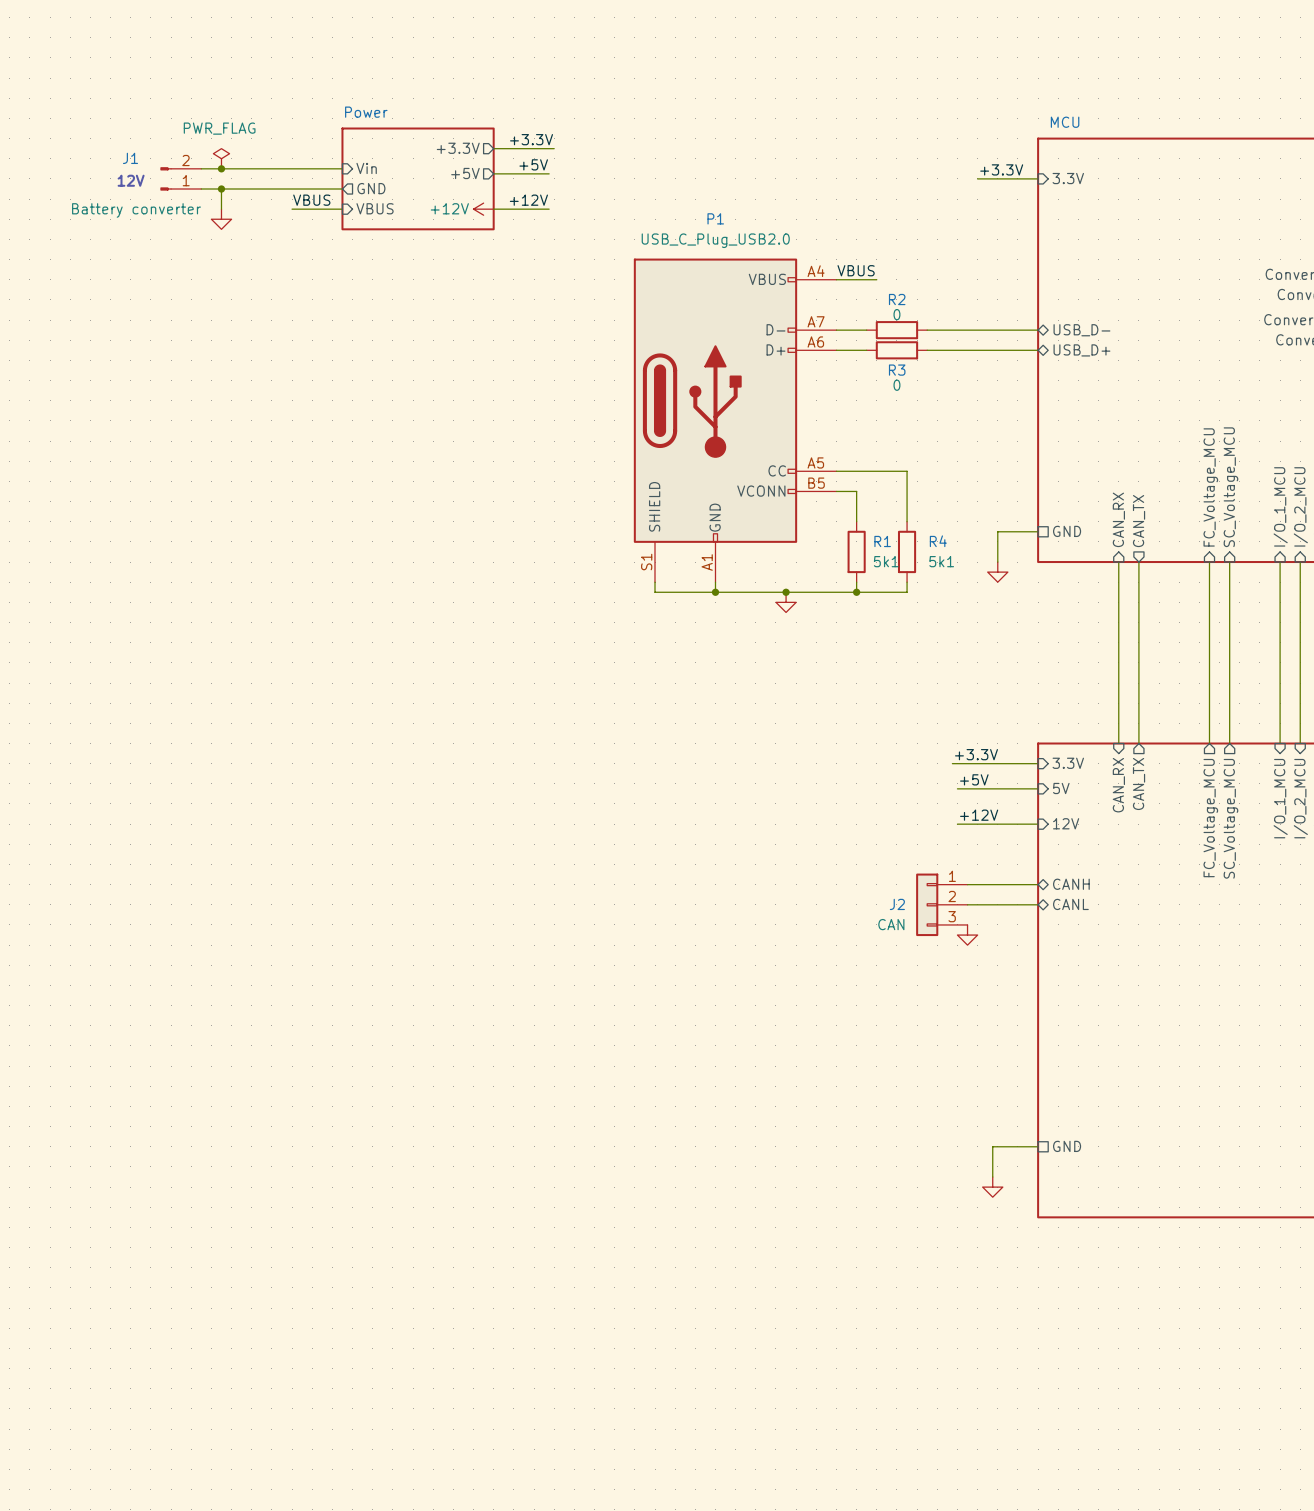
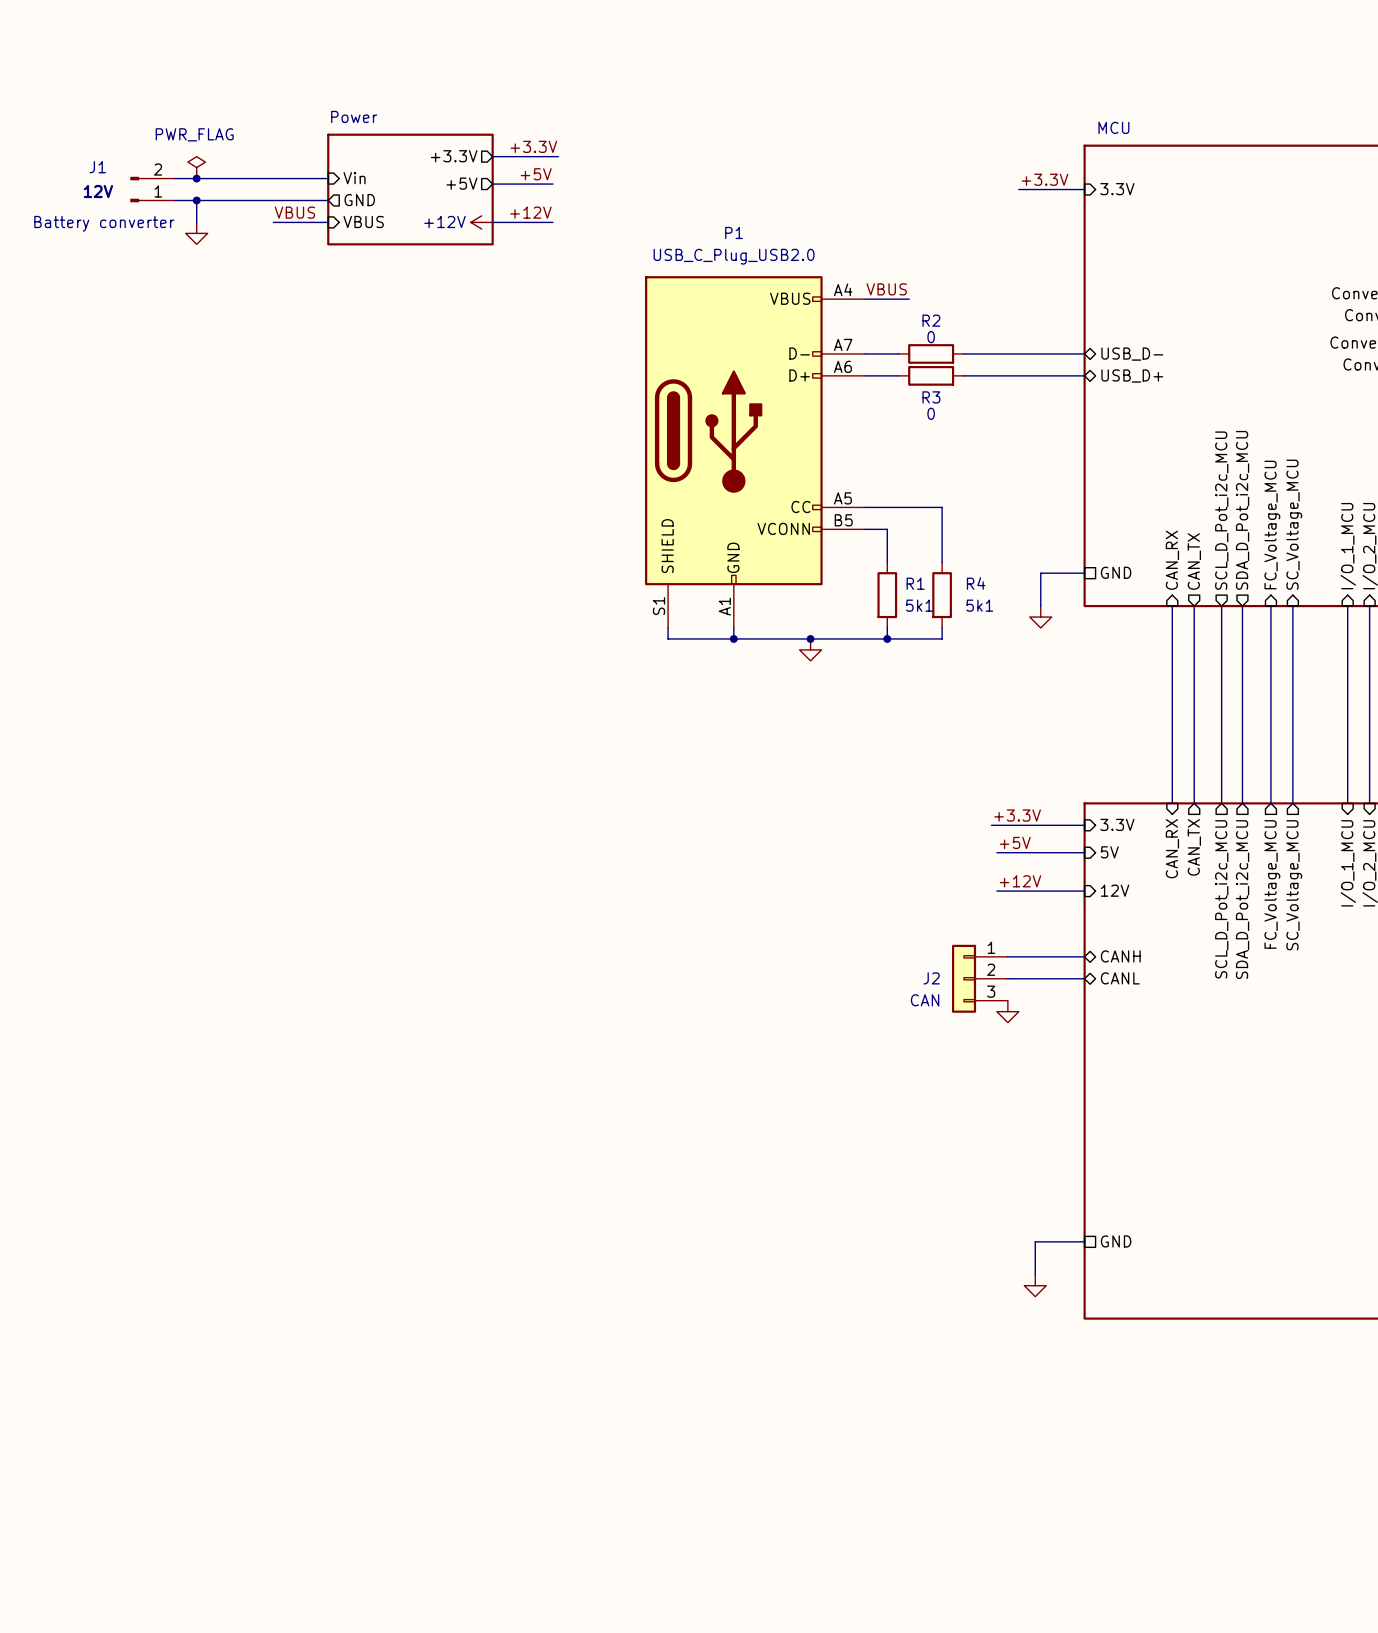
sheet pin: none -> SCL_D_Pot_i2c_MCU (1221, 510)
sheet pin: none -> SDA_D_Pot_i2c_MCU (1242, 510)
wire: none -> (1221, 606) (1221, 803)
wire: none -> (1242, 606) (1242, 803)
sheet pin: none -> SCL_D_Pot_i2c_MCU (1221, 899)
sheet pin: none -> SDA_D_Pot_i2c_MCU (1242, 899)

